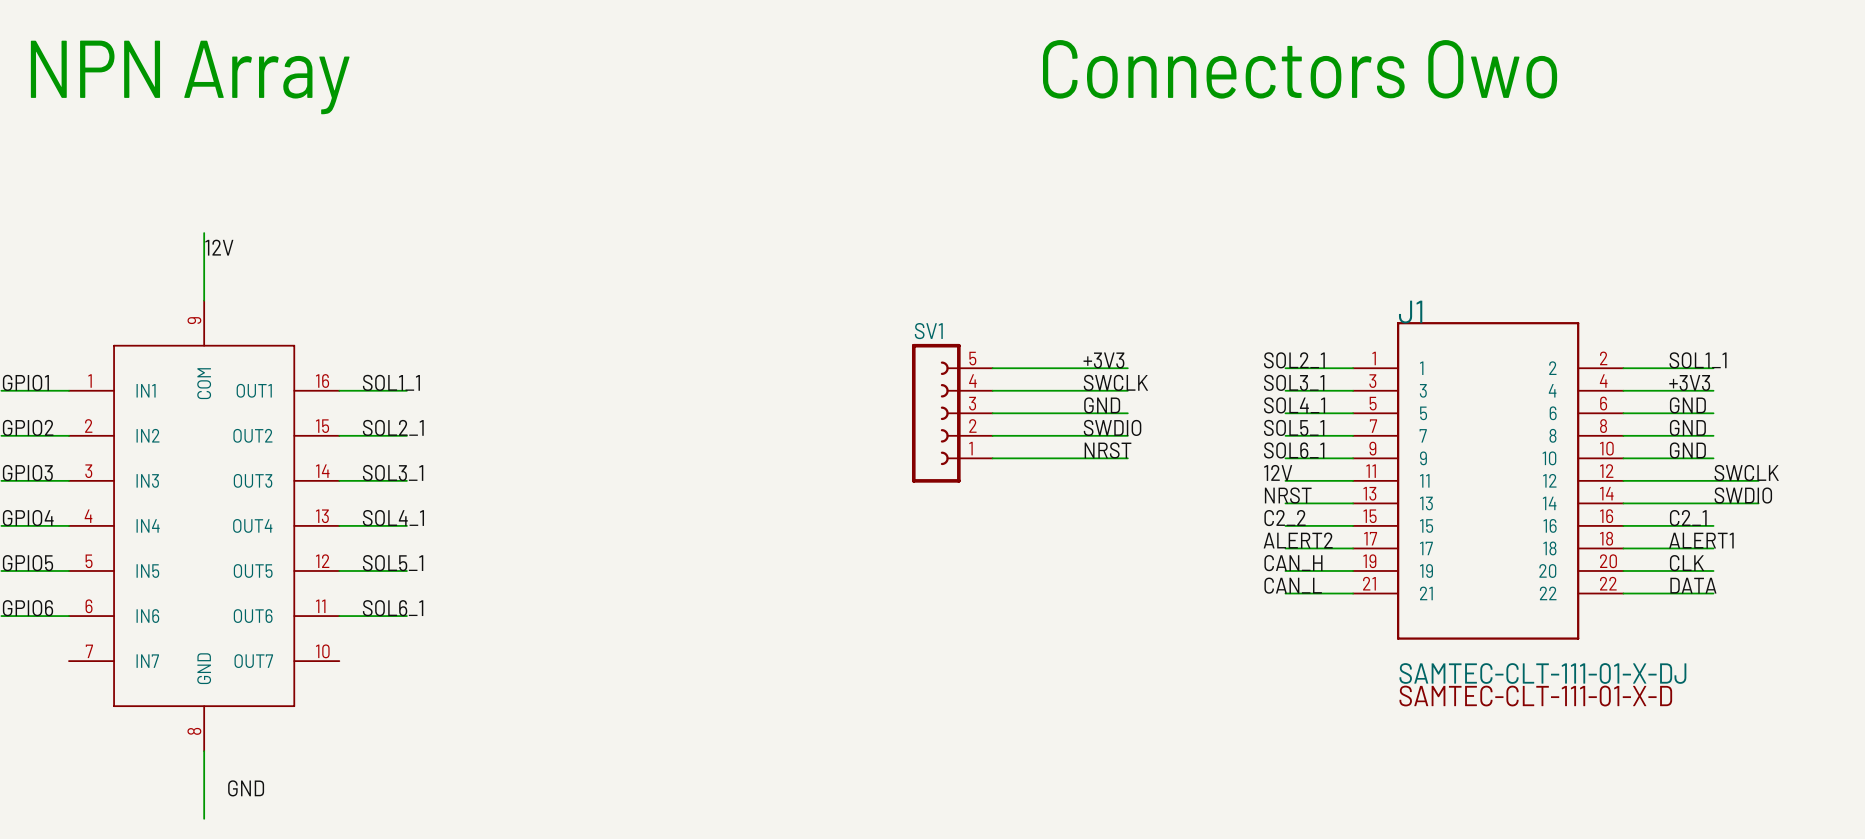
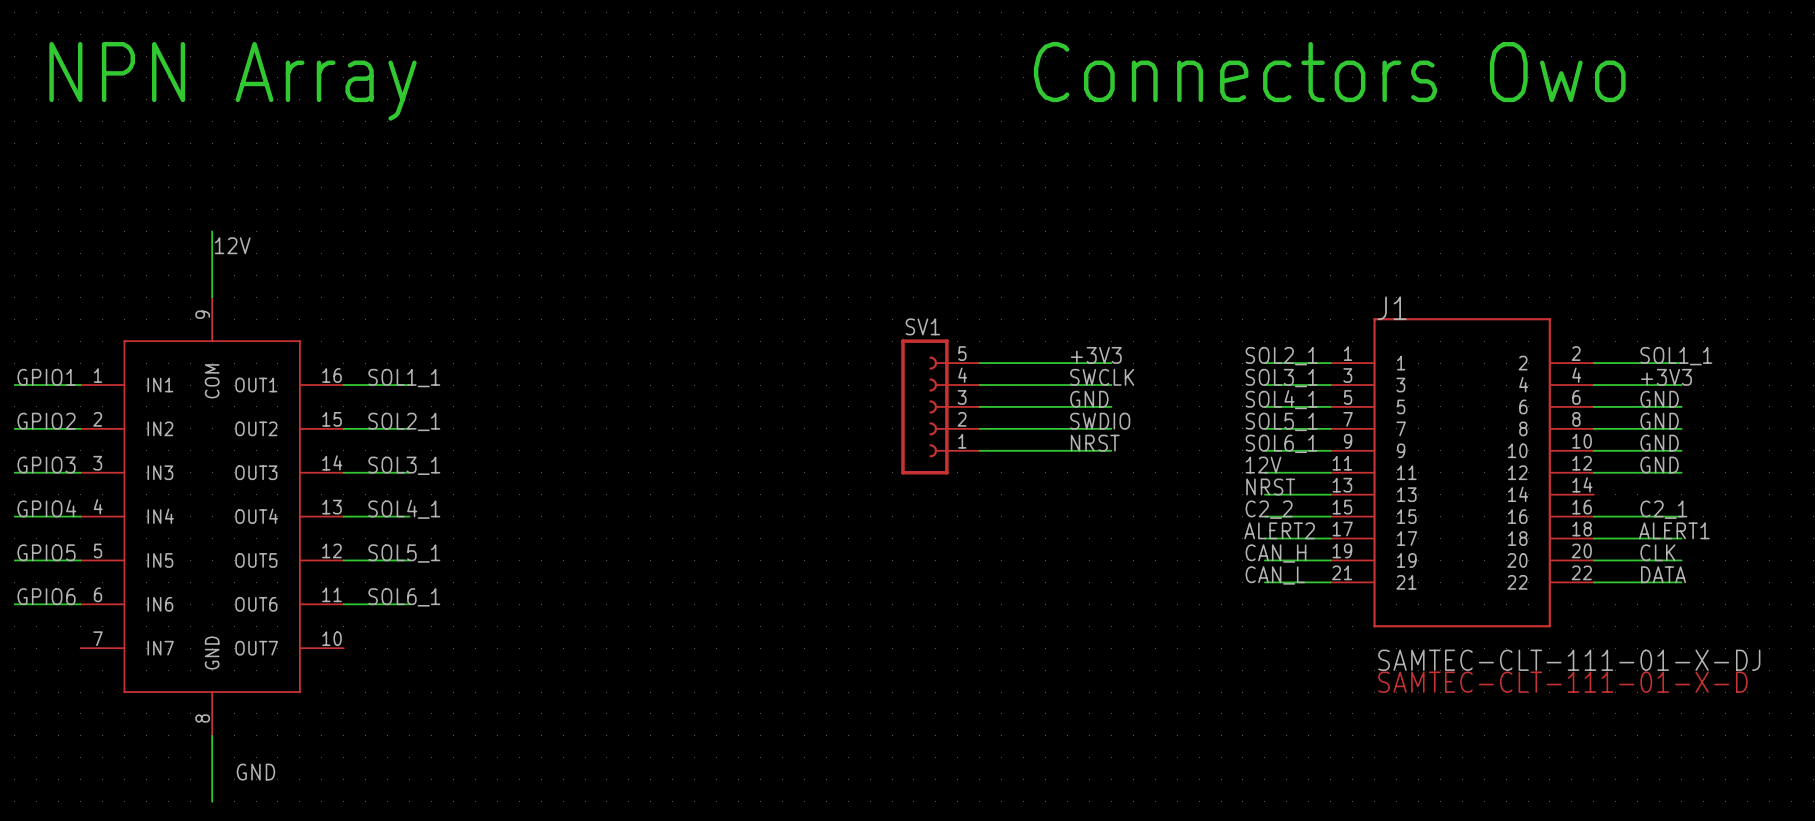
label: none -> GND (1659, 465)
label: SWCLK (1746, 473) -> none
wire: (1713, 480) (1758, 480) -> none
label: SWDIO (1743, 495) -> none
wire: (1623, 503) (1758, 503) -> none

